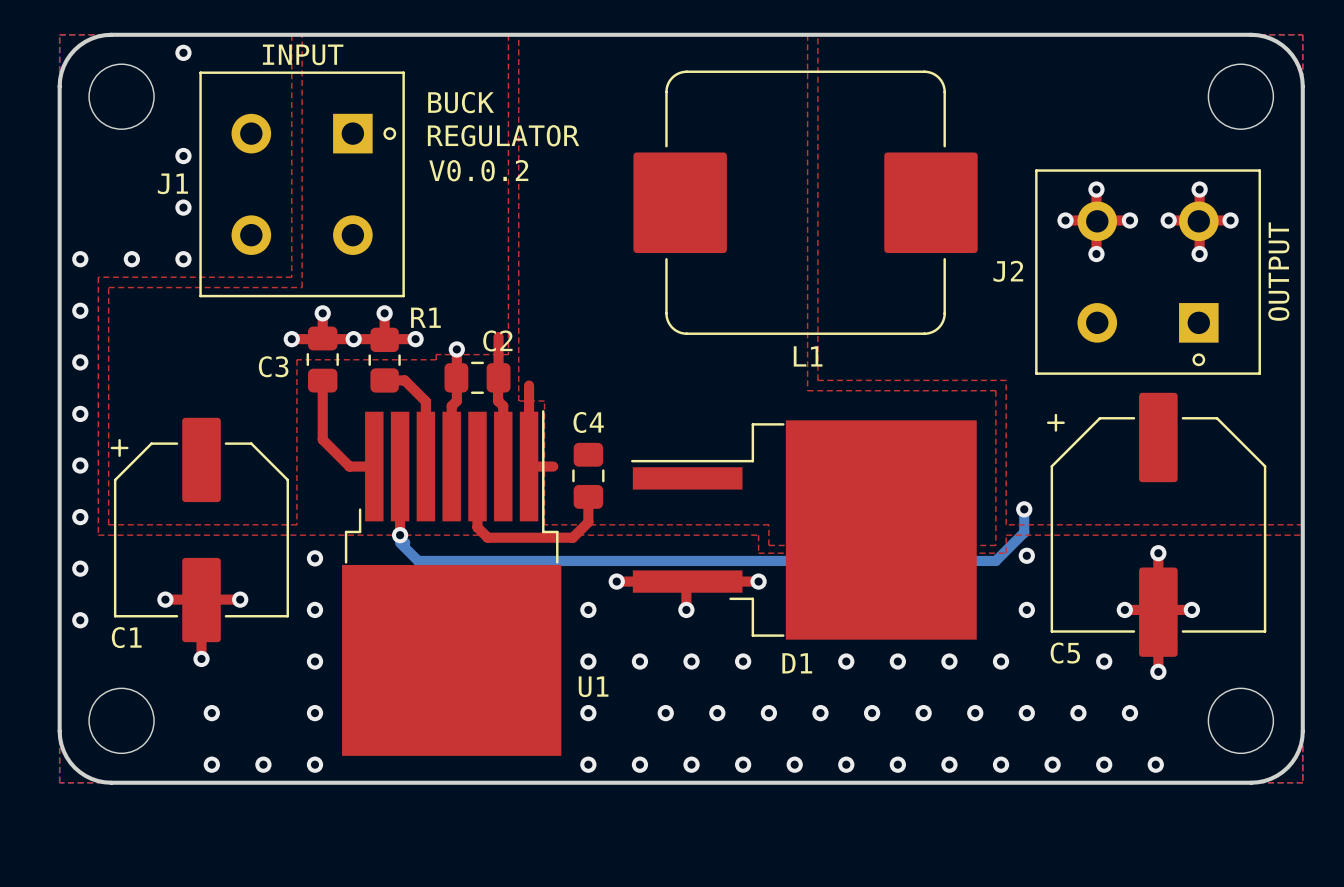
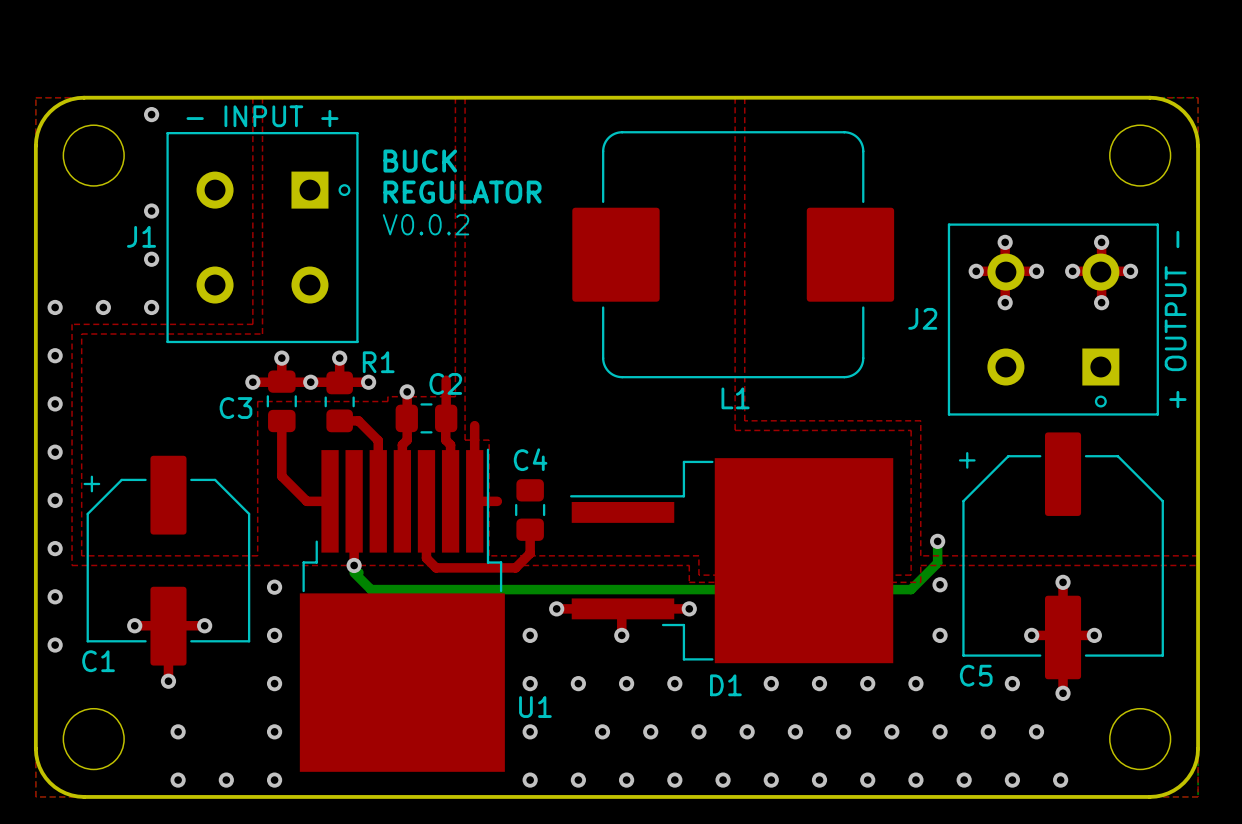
J1 value: INPUT (303, 54) -> - INPUT + (262, 116)
J2 value: OUTPUT (1278, 271) -> + OUTPUT - (1175, 319)

